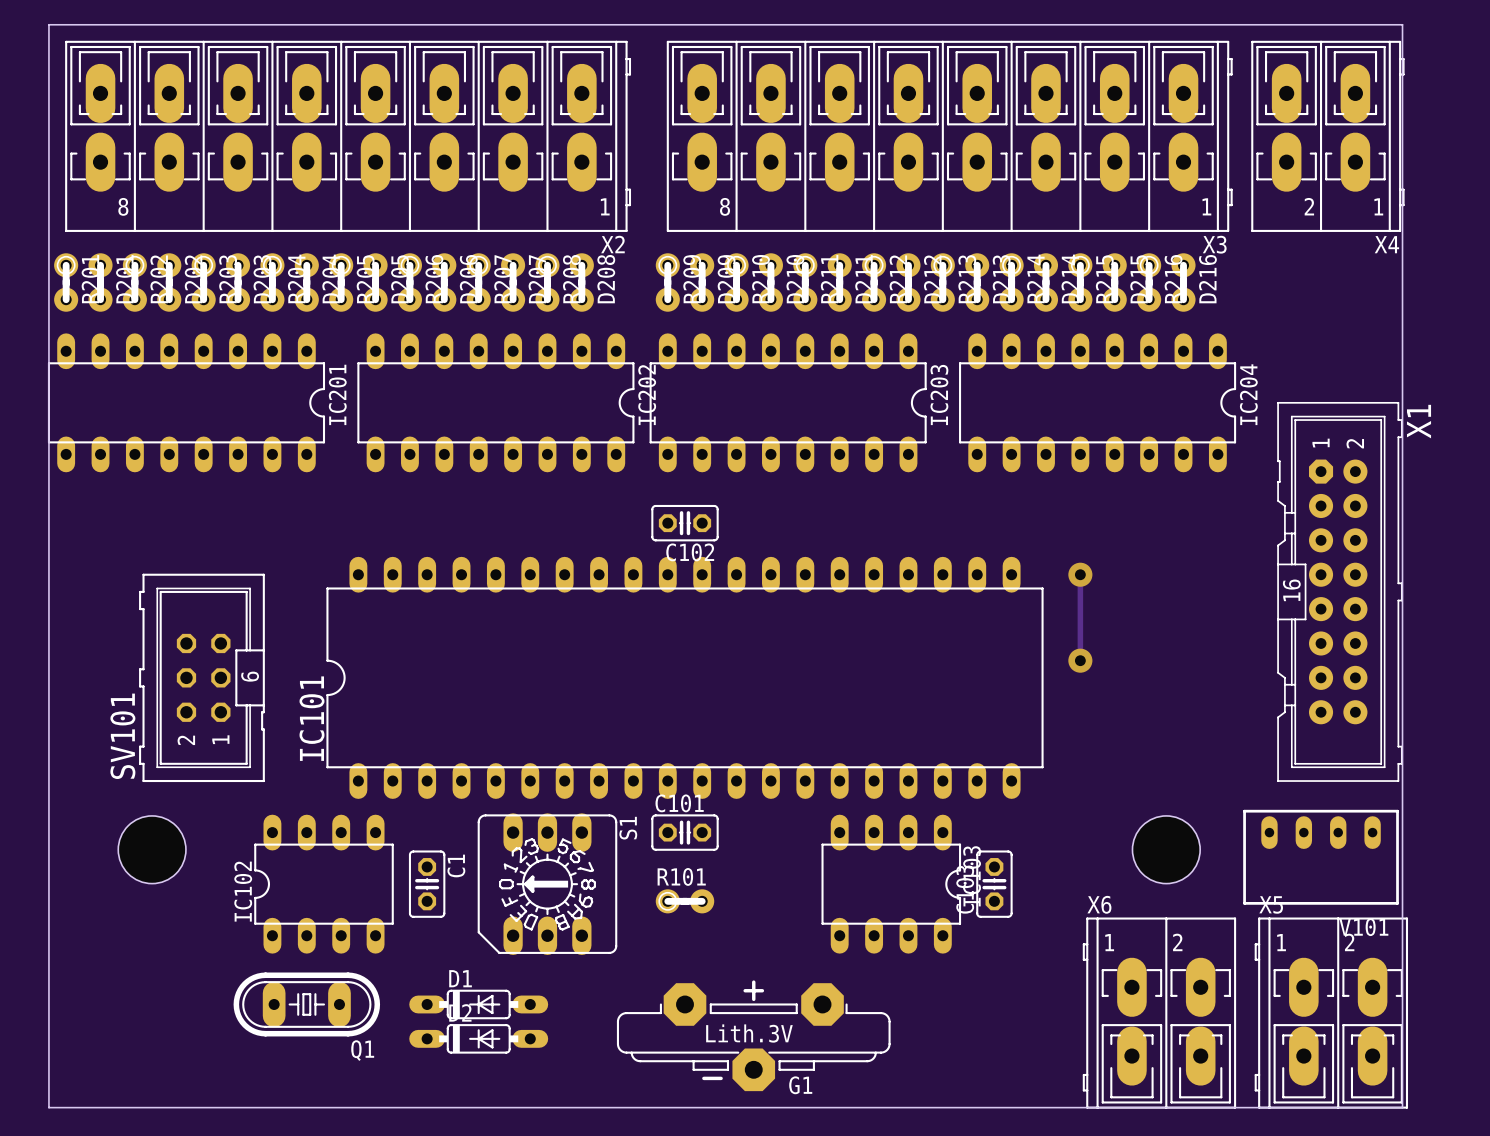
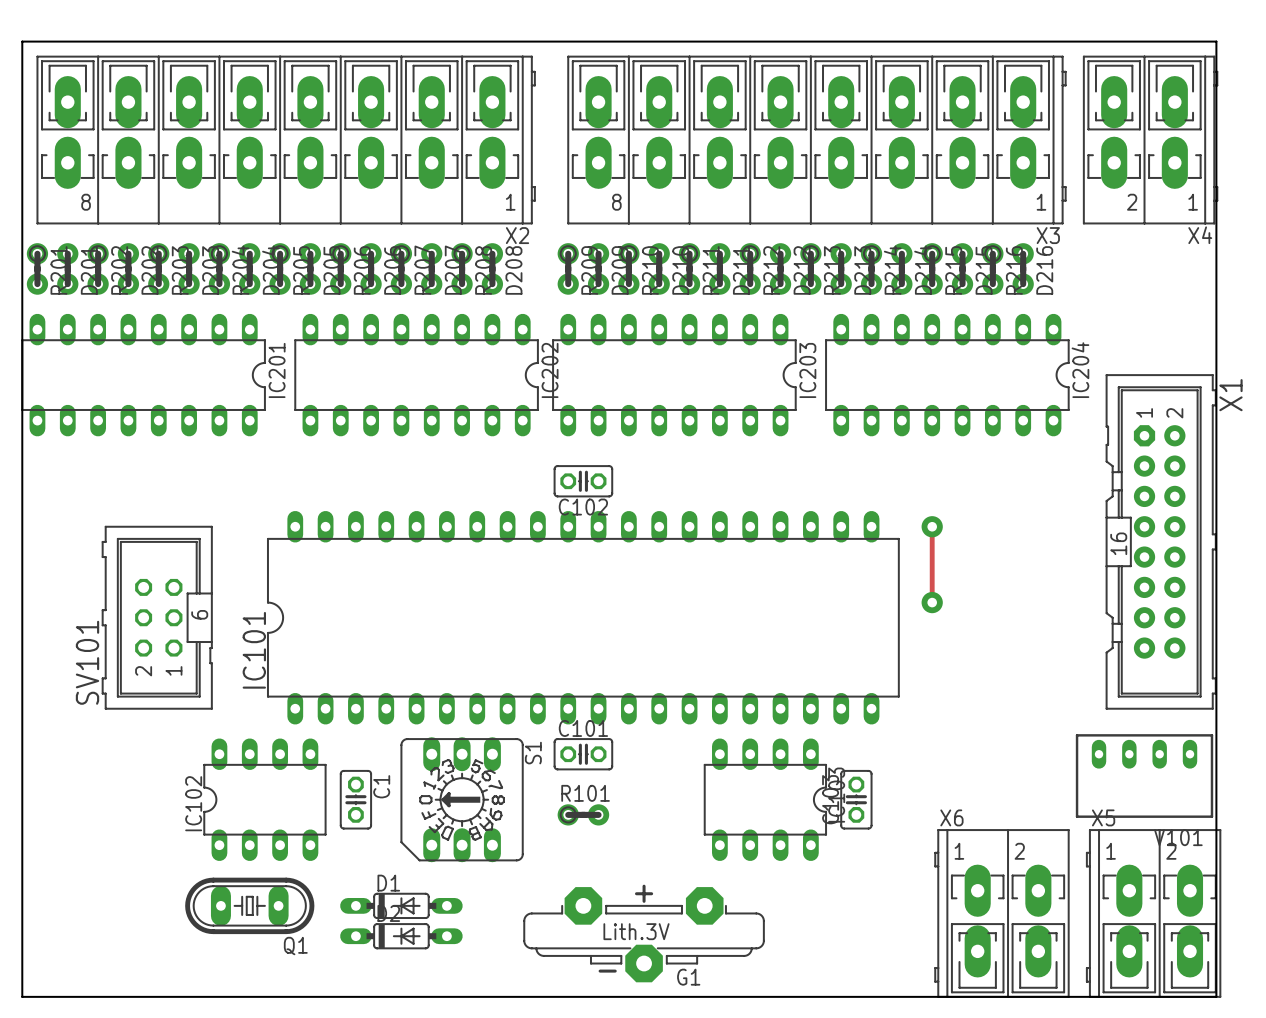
hole: (152, 849) -> none
hole: (1166, 849) -> none

